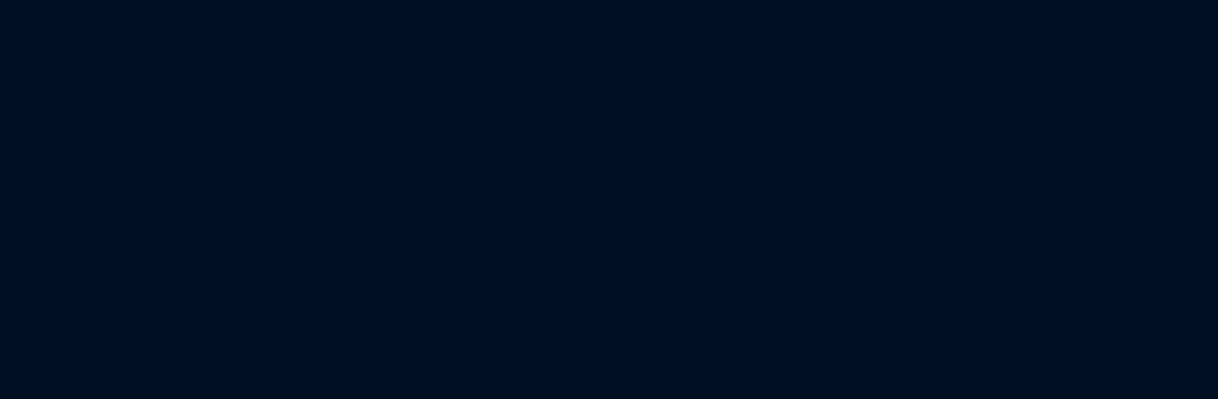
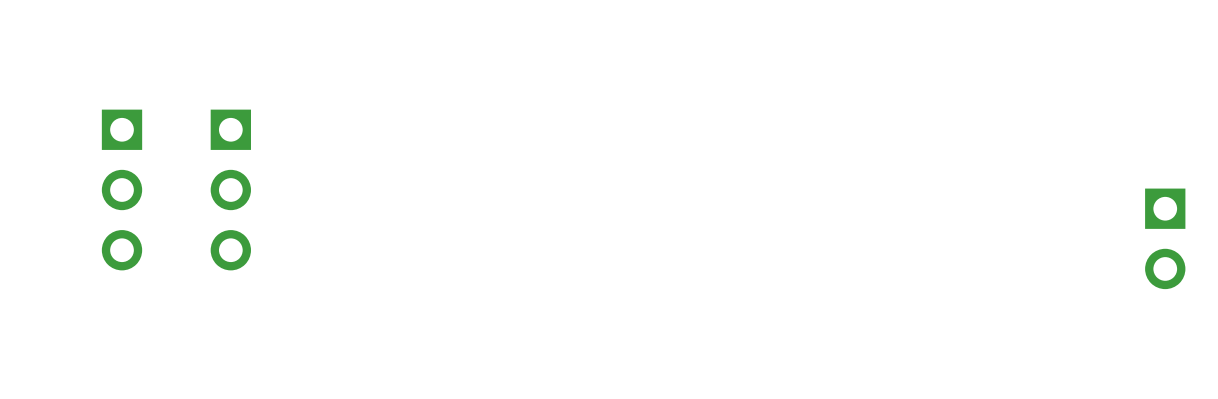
part: none -> (122, 190)
part: none -> (230, 190)
part: none -> (1165, 238)

